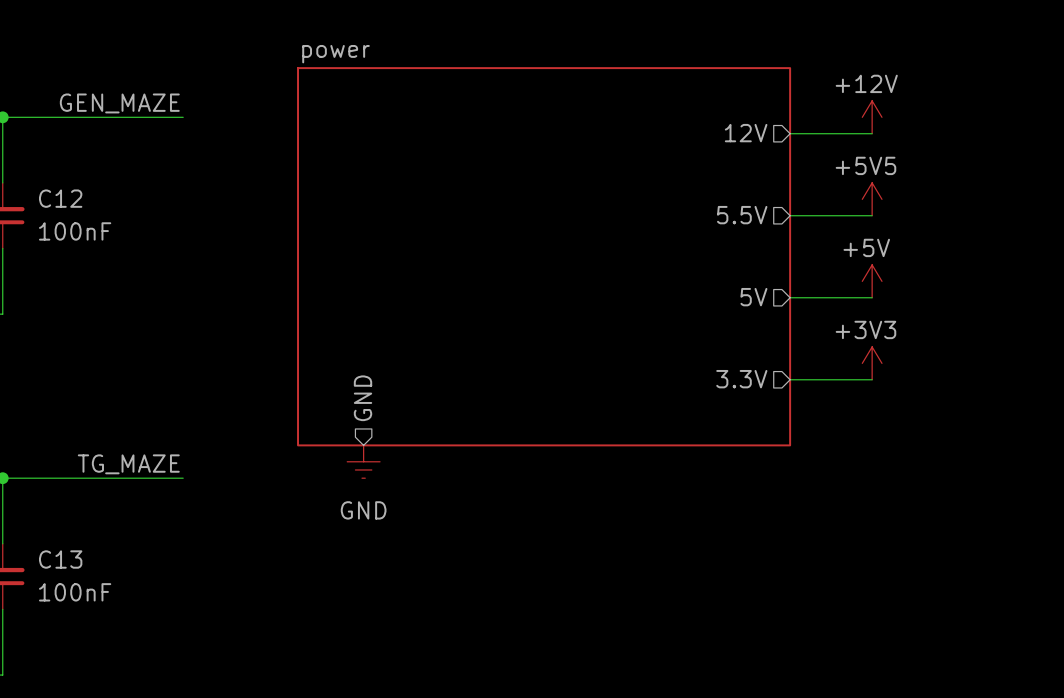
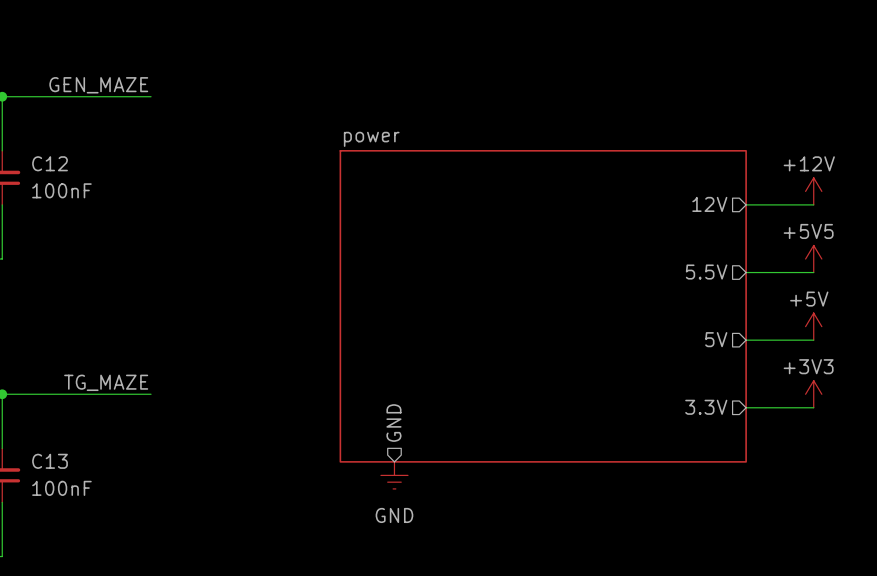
power symbol position: +12V (872, 117) -> +12V (813, 191)
sheet pin position: 12V (746, 133) -> 12V (709, 204)
wire: (790, 133) (872, 133) -> (746, 204) (813, 204)
power symbol position: +5V5 (872, 199) -> +5V5 (813, 259)
sheet pin position: 5.5V (742, 215) -> 5.5V (706, 272)
wire: (790, 215) (872, 215) -> (746, 272) (813, 272)
sheet power position: (544, 256) -> (543, 306)
power symbol position: +5V (872, 281) -> +5V (813, 326)
sheet pin position: 5V (753, 297) -> 5V (716, 339)
wire: (790, 297) (872, 297) -> (746, 340) (813, 340)
power symbol position: +3V3 (872, 363) -> +3V3 (813, 394)
sheet pin position: 3.3V (741, 379) -> 3.3V (706, 407)
wire: (790, 379) (872, 379) -> (746, 407) (813, 407)
sheet pin position: GND (363, 398) -> GND (393, 423)
power symbol position: GND (363, 461) -> GND (394, 475)

